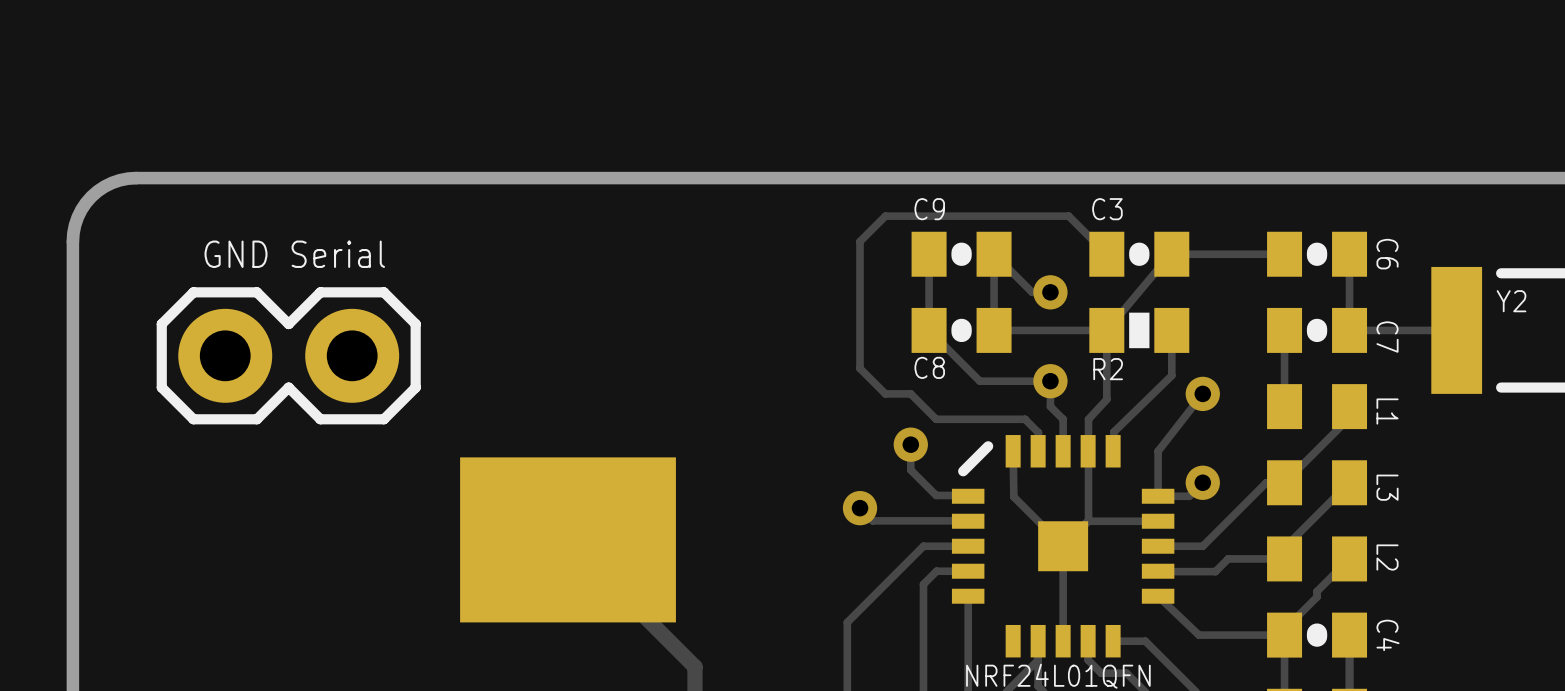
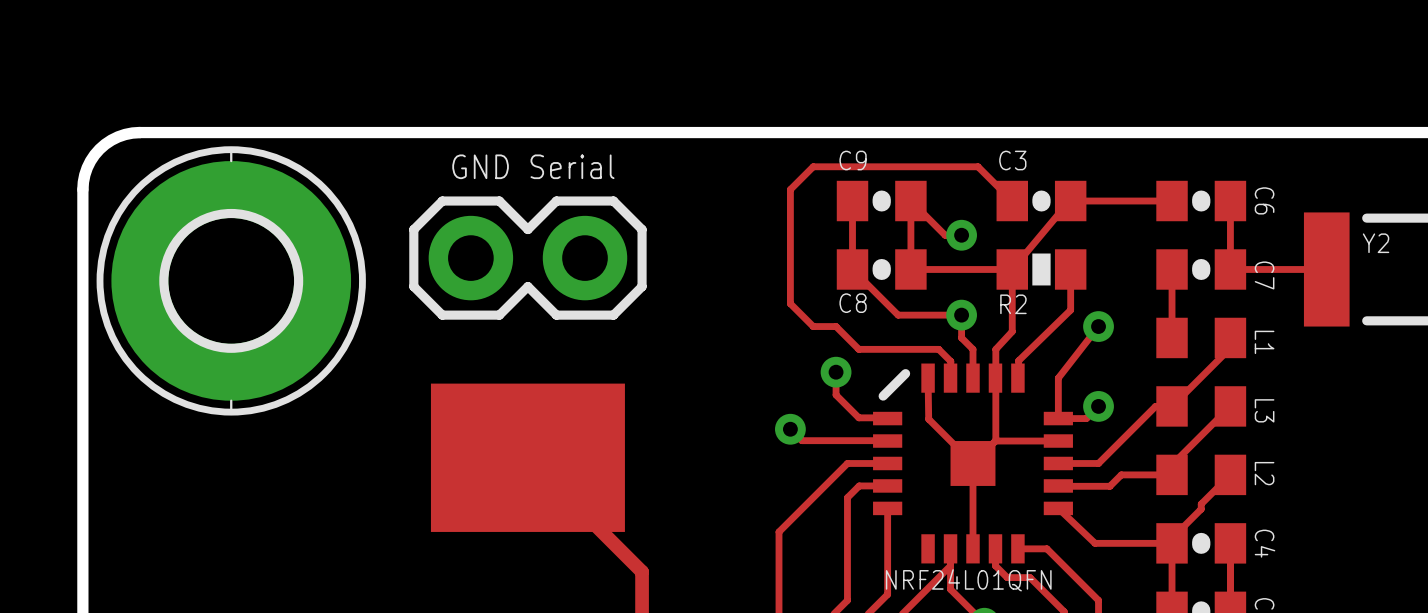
text position: GND Serial (294, 254) -> GND Serial (533, 166)
part: none -> (231, 280)
part position: (288, 355) -> (527, 258)

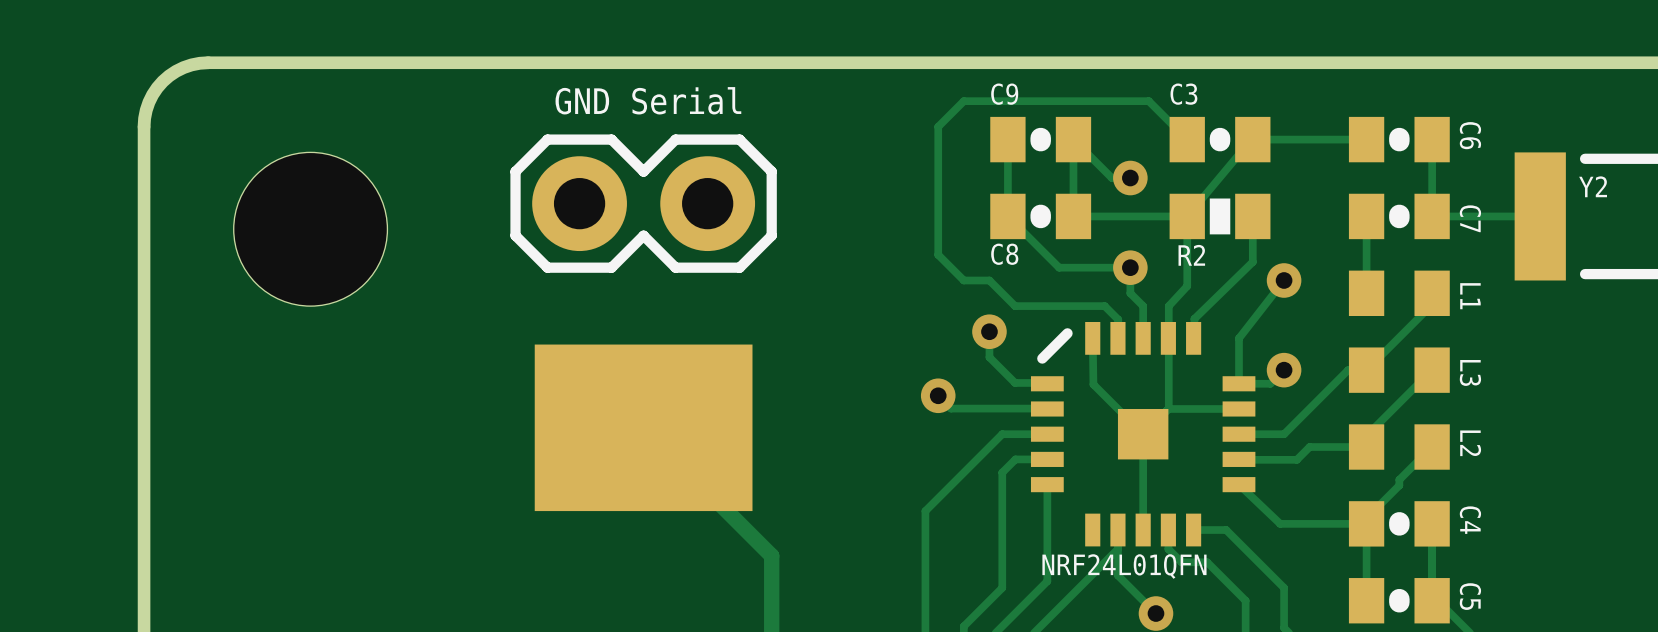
part: (231, 280) -> none
hole: none -> (310, 229)

